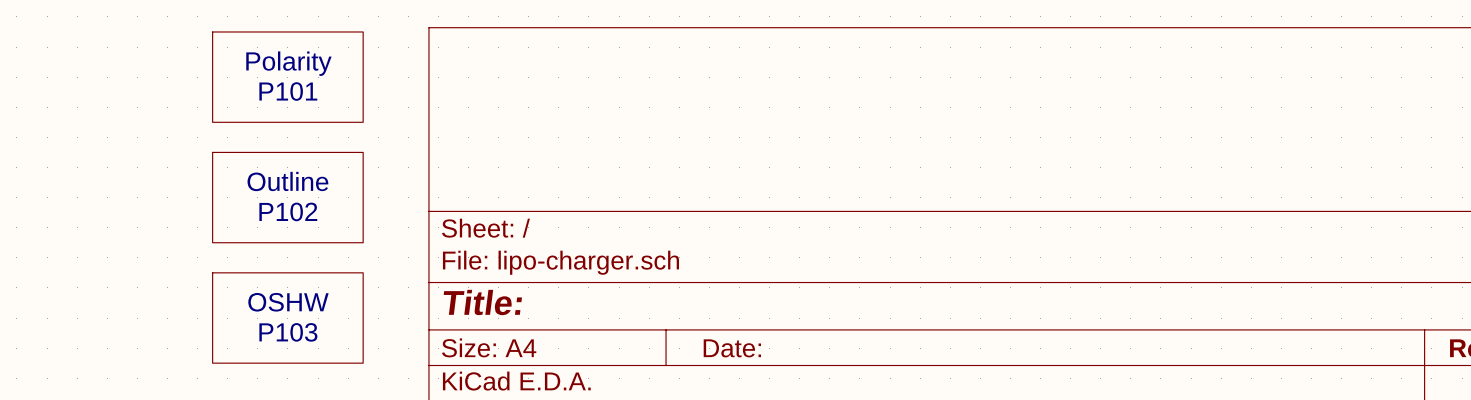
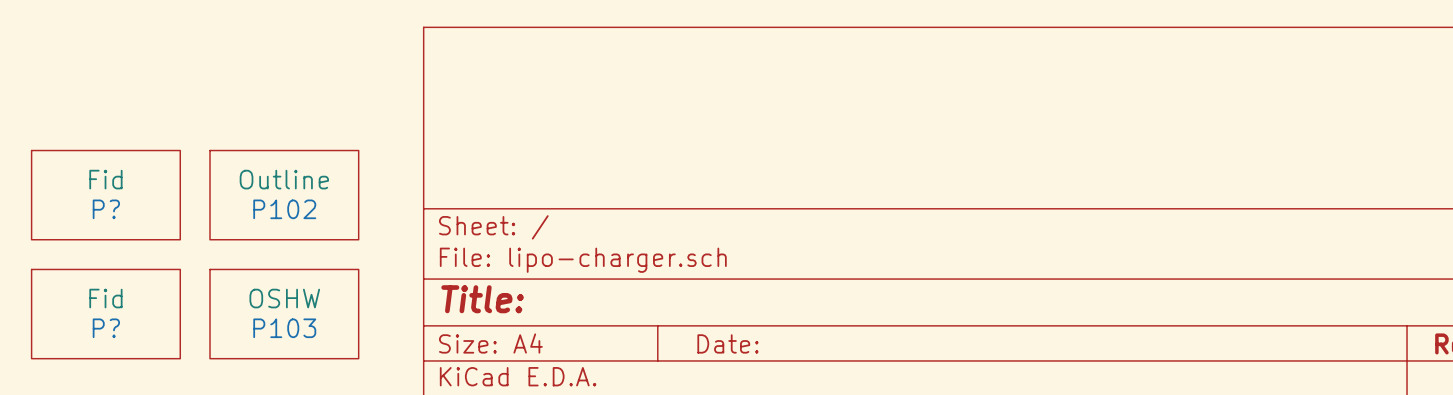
P101: Polarity (287, 77) -> none
P?: none -> Fid (105, 195)
P?: none -> Fid (105, 314)

